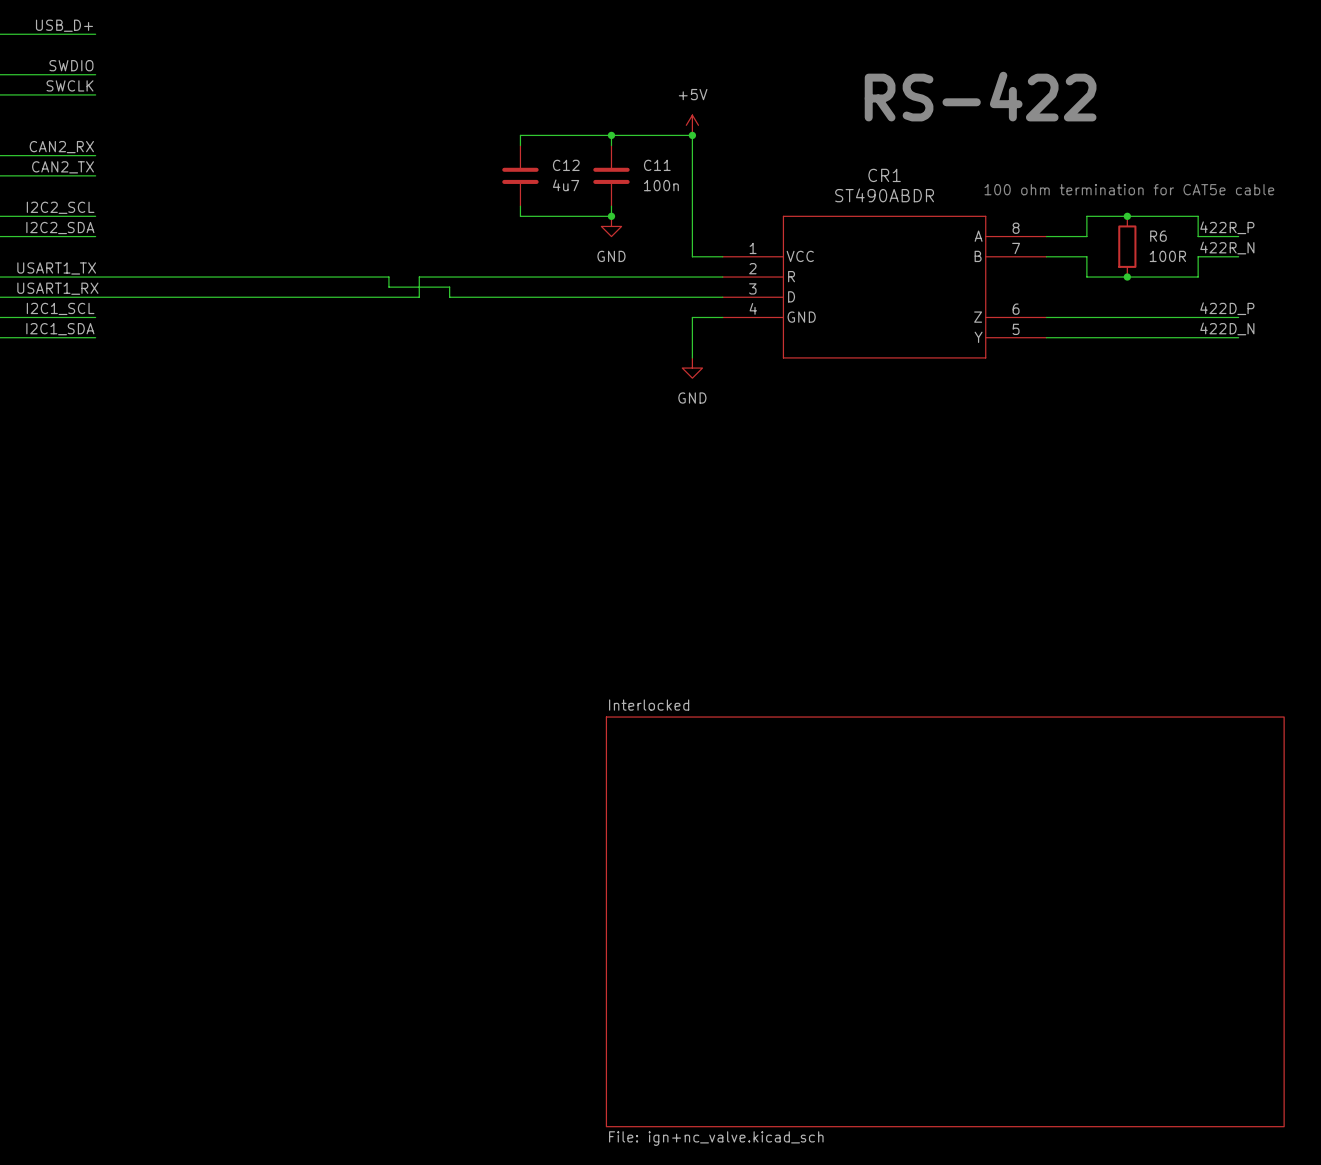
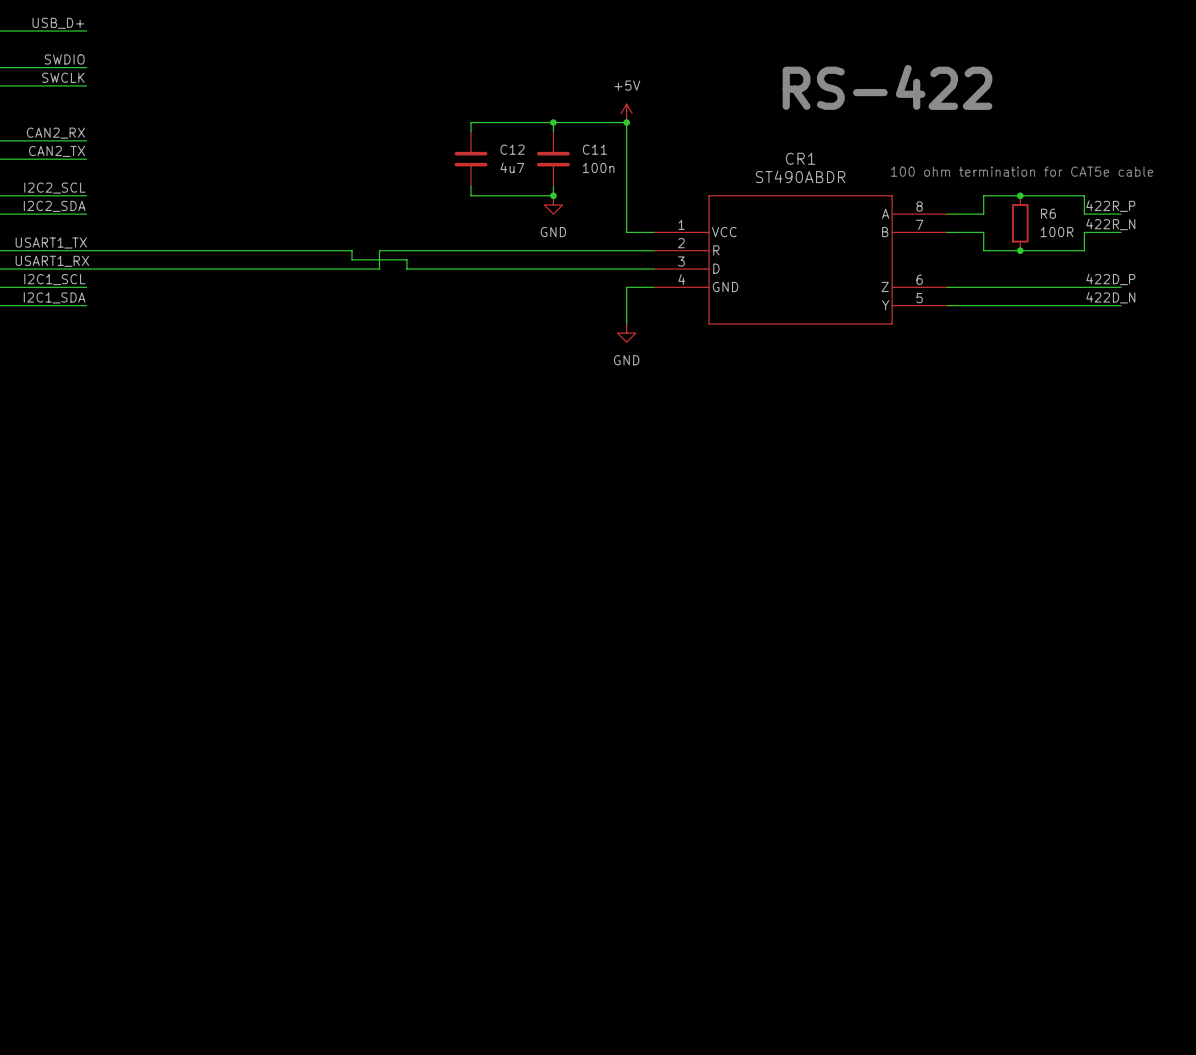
sheet Interlocked: File: ign+nc_valve.kicad_sch (945, 921) -> none

